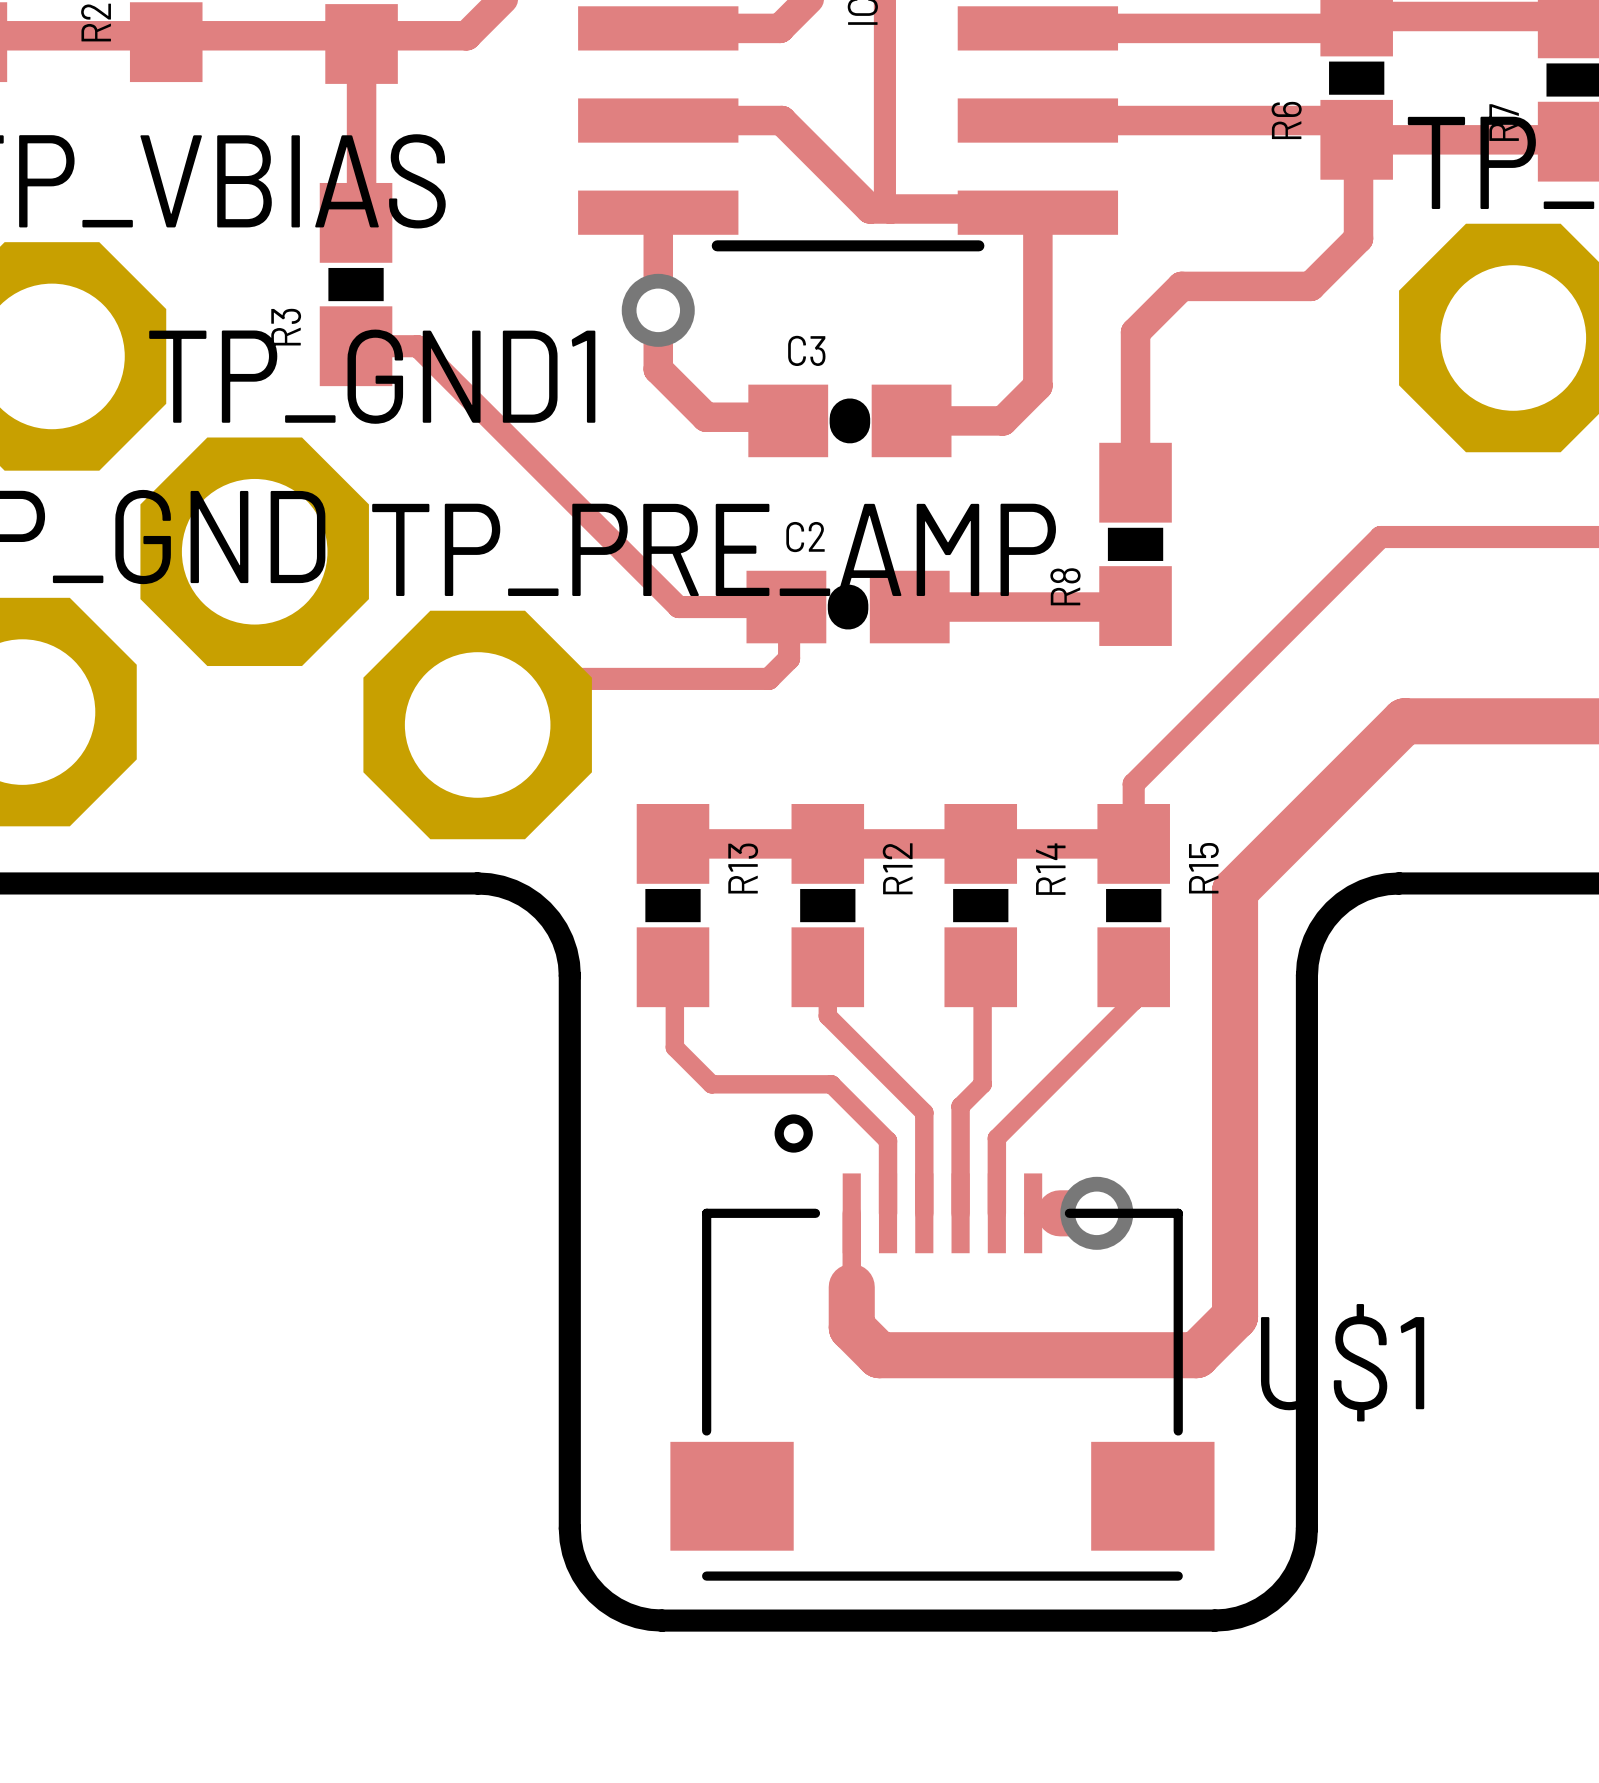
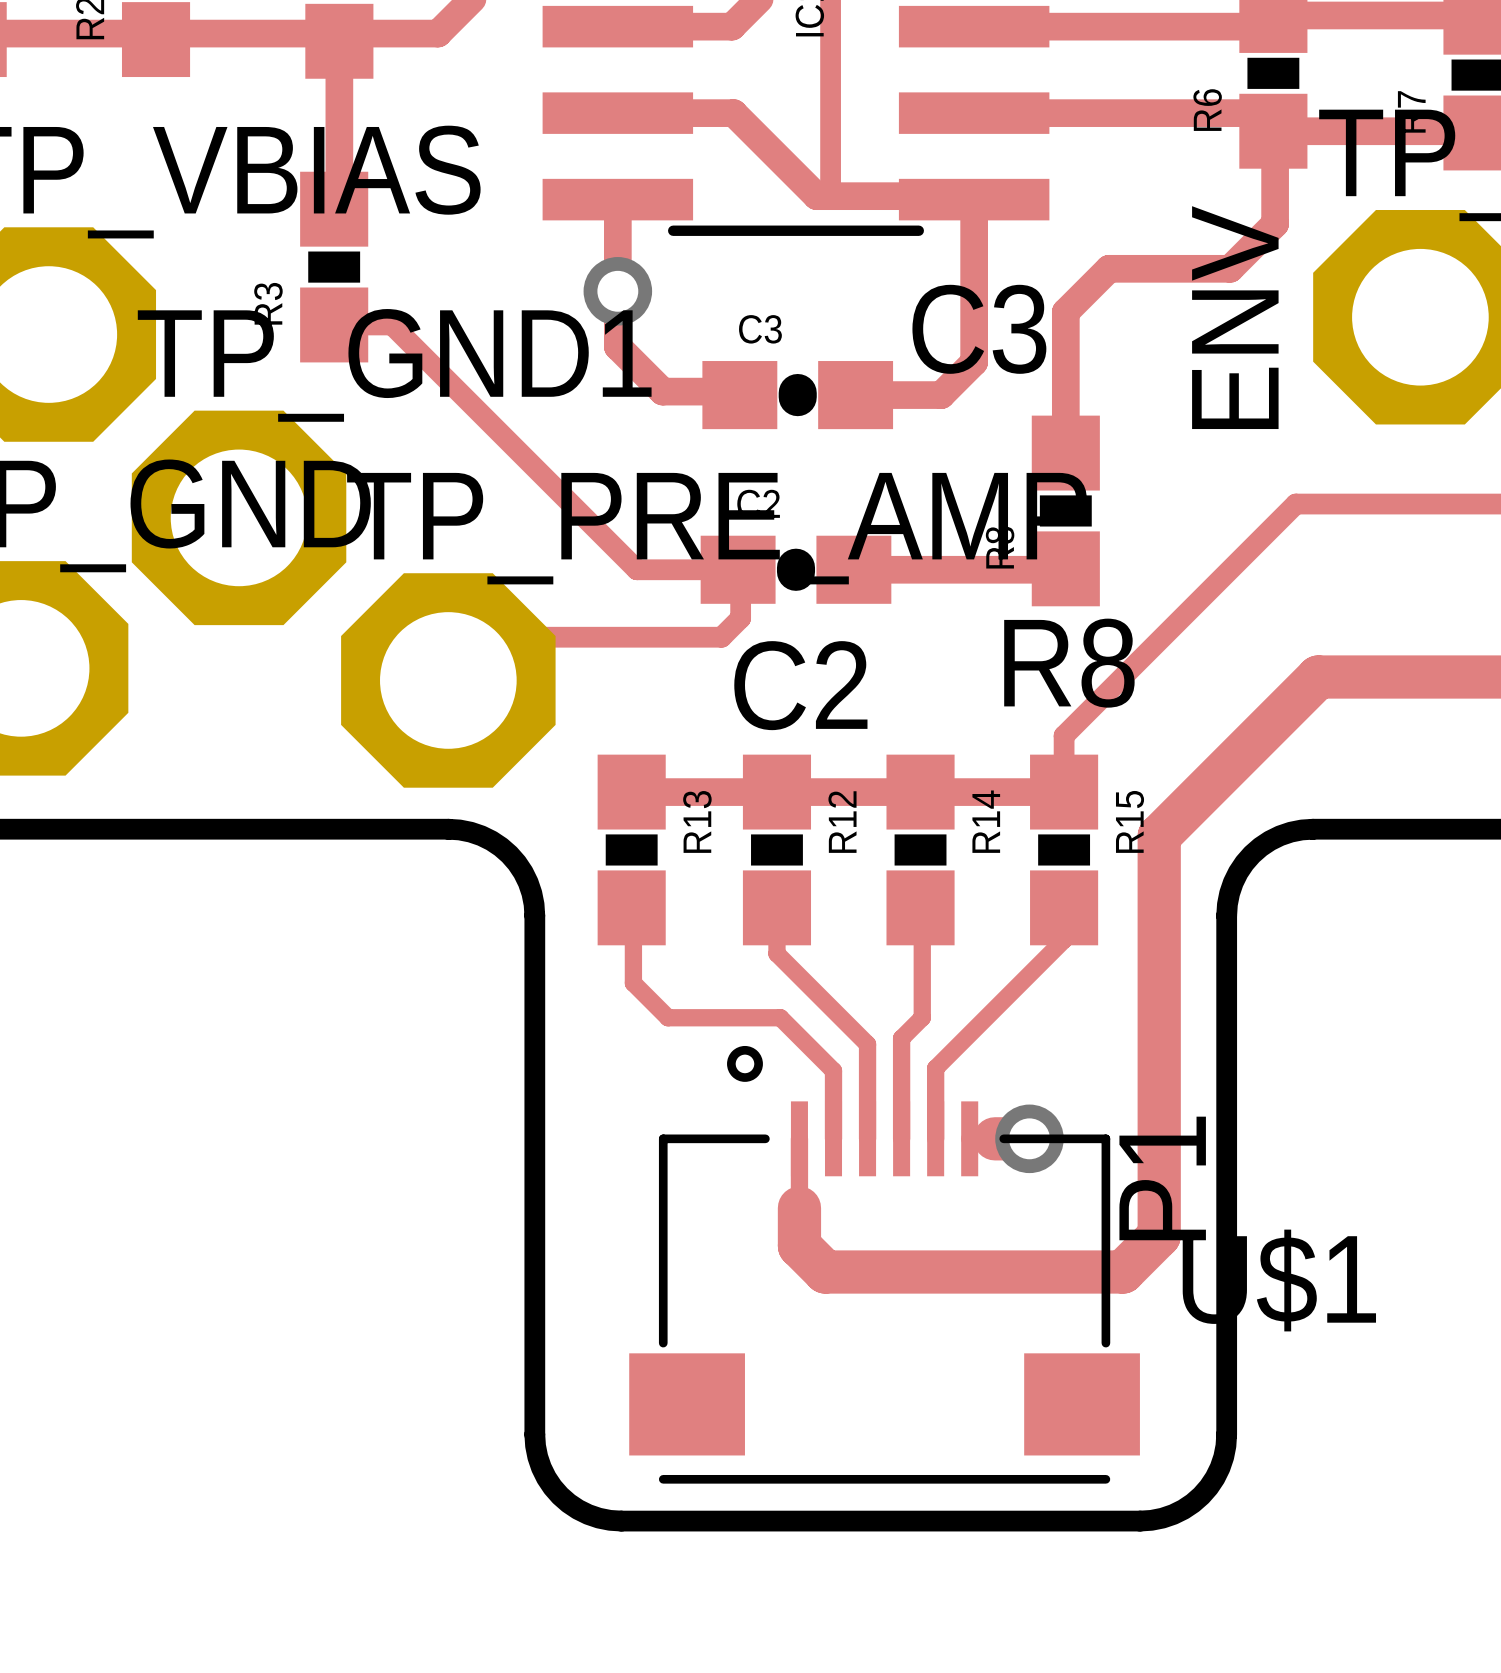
text: none -> C3 (979, 329)
text: none -> ENV (1235, 317)
text: none -> R8 (1069, 663)
text: none -> C2 (800, 685)
text: none -> P1 (1162, 1178)

